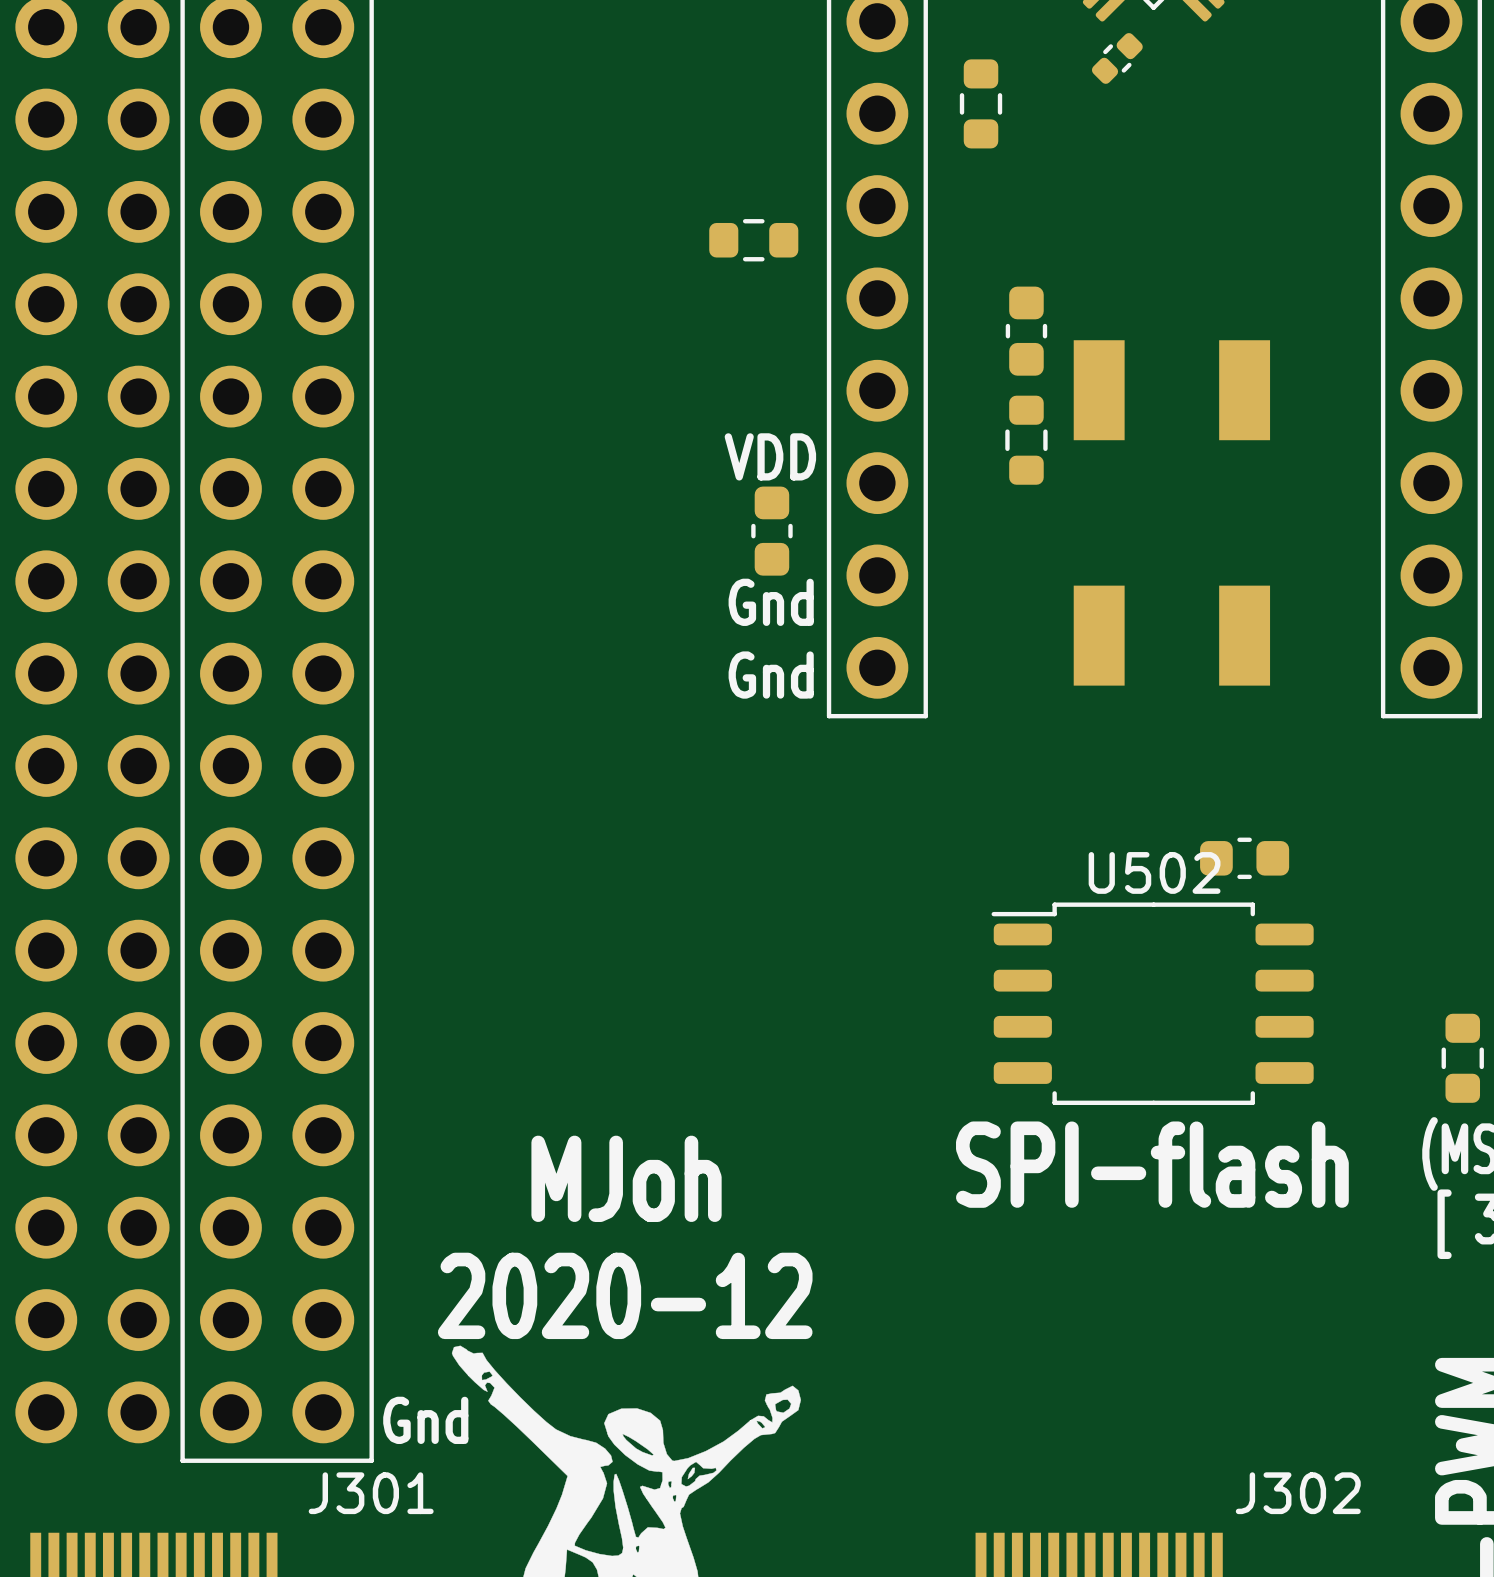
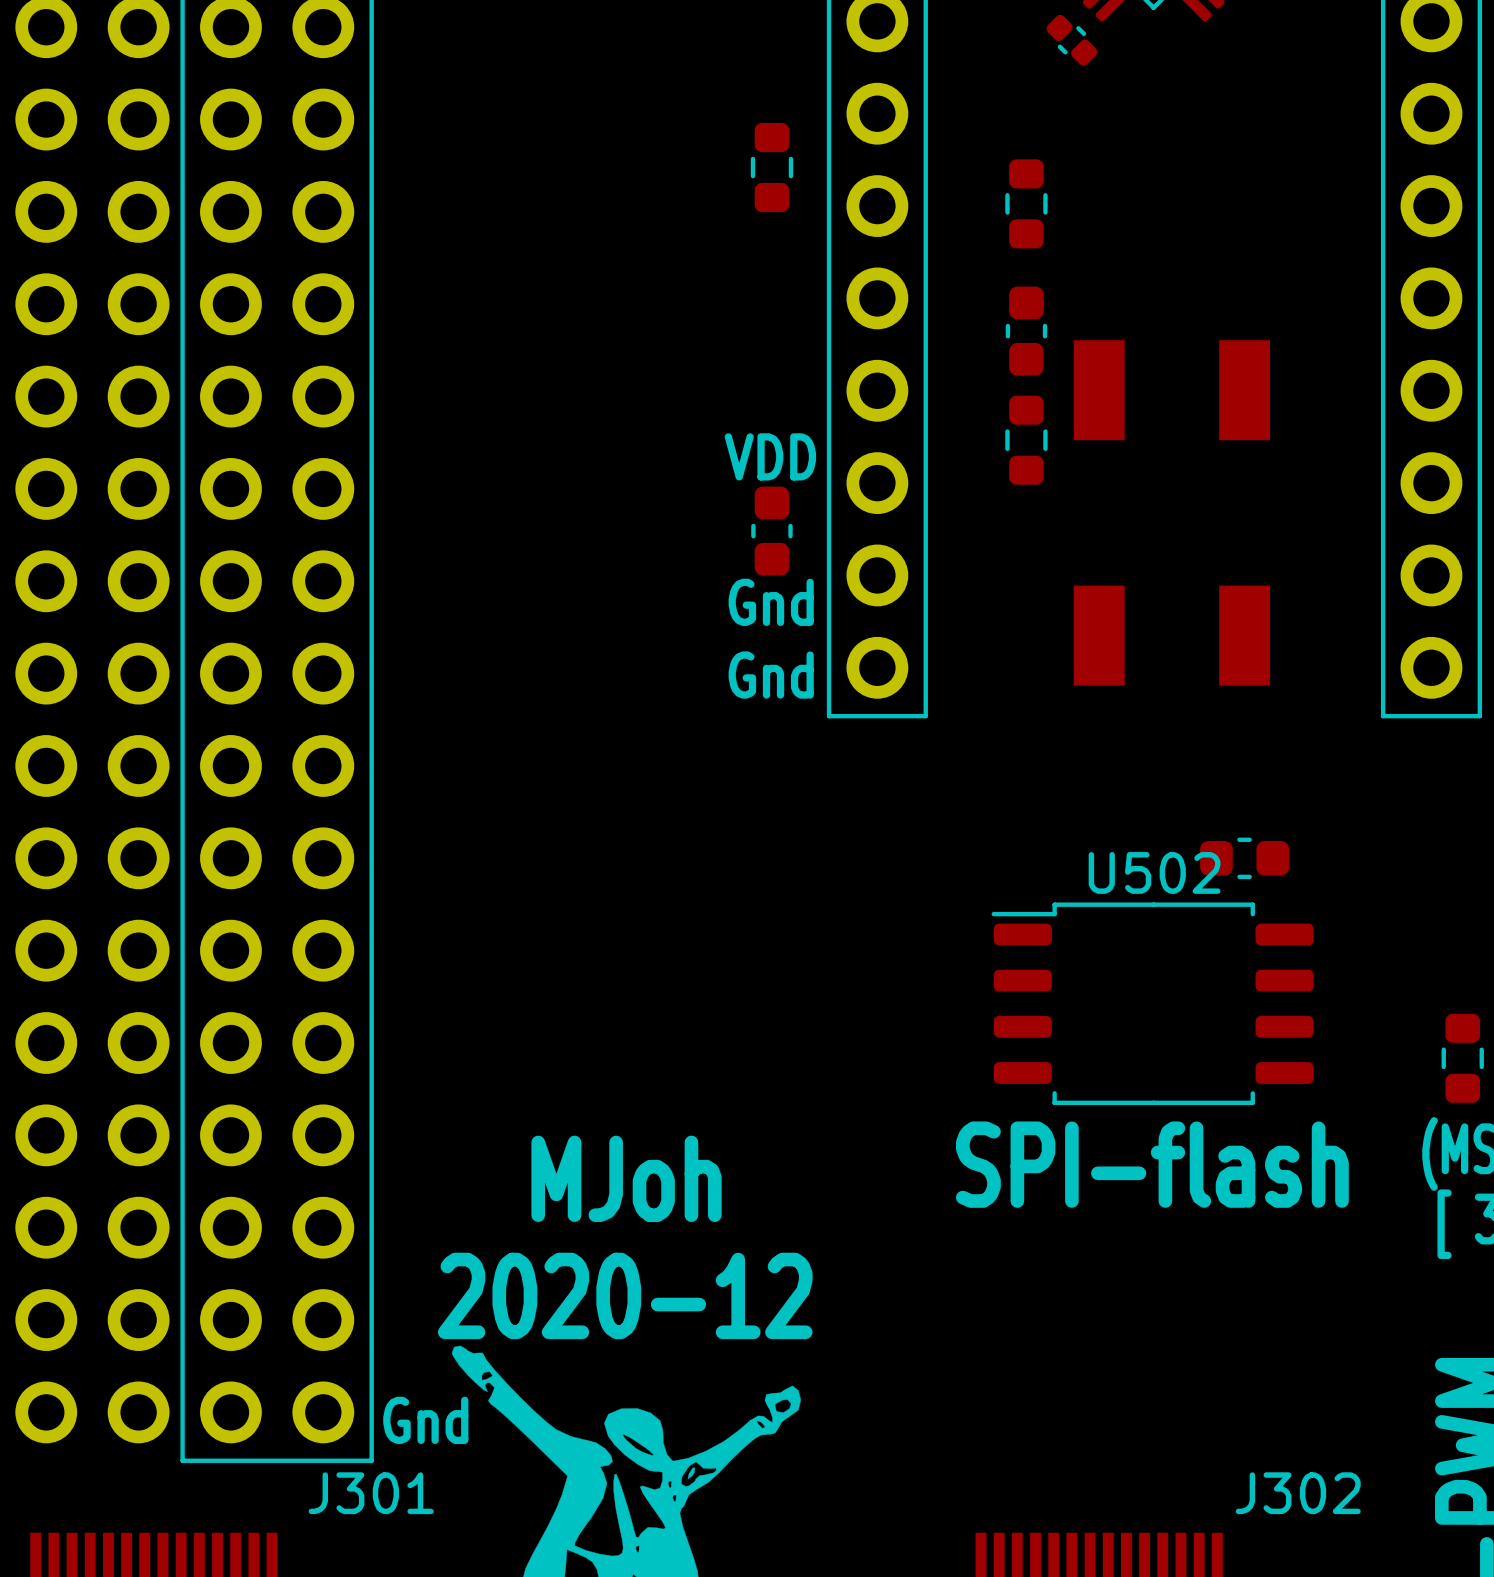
part rotation: 0° (1117, 58) -> 90° clockwise (1071, 40)
part position: (1117, 58) -> (1071, 40)
part: (981, 103) -> none
part: none -> (1026, 203)
part rotation: 0° (753, 240) -> 90° clockwise (771, 167)
part position: (753, 240) -> (771, 167)

